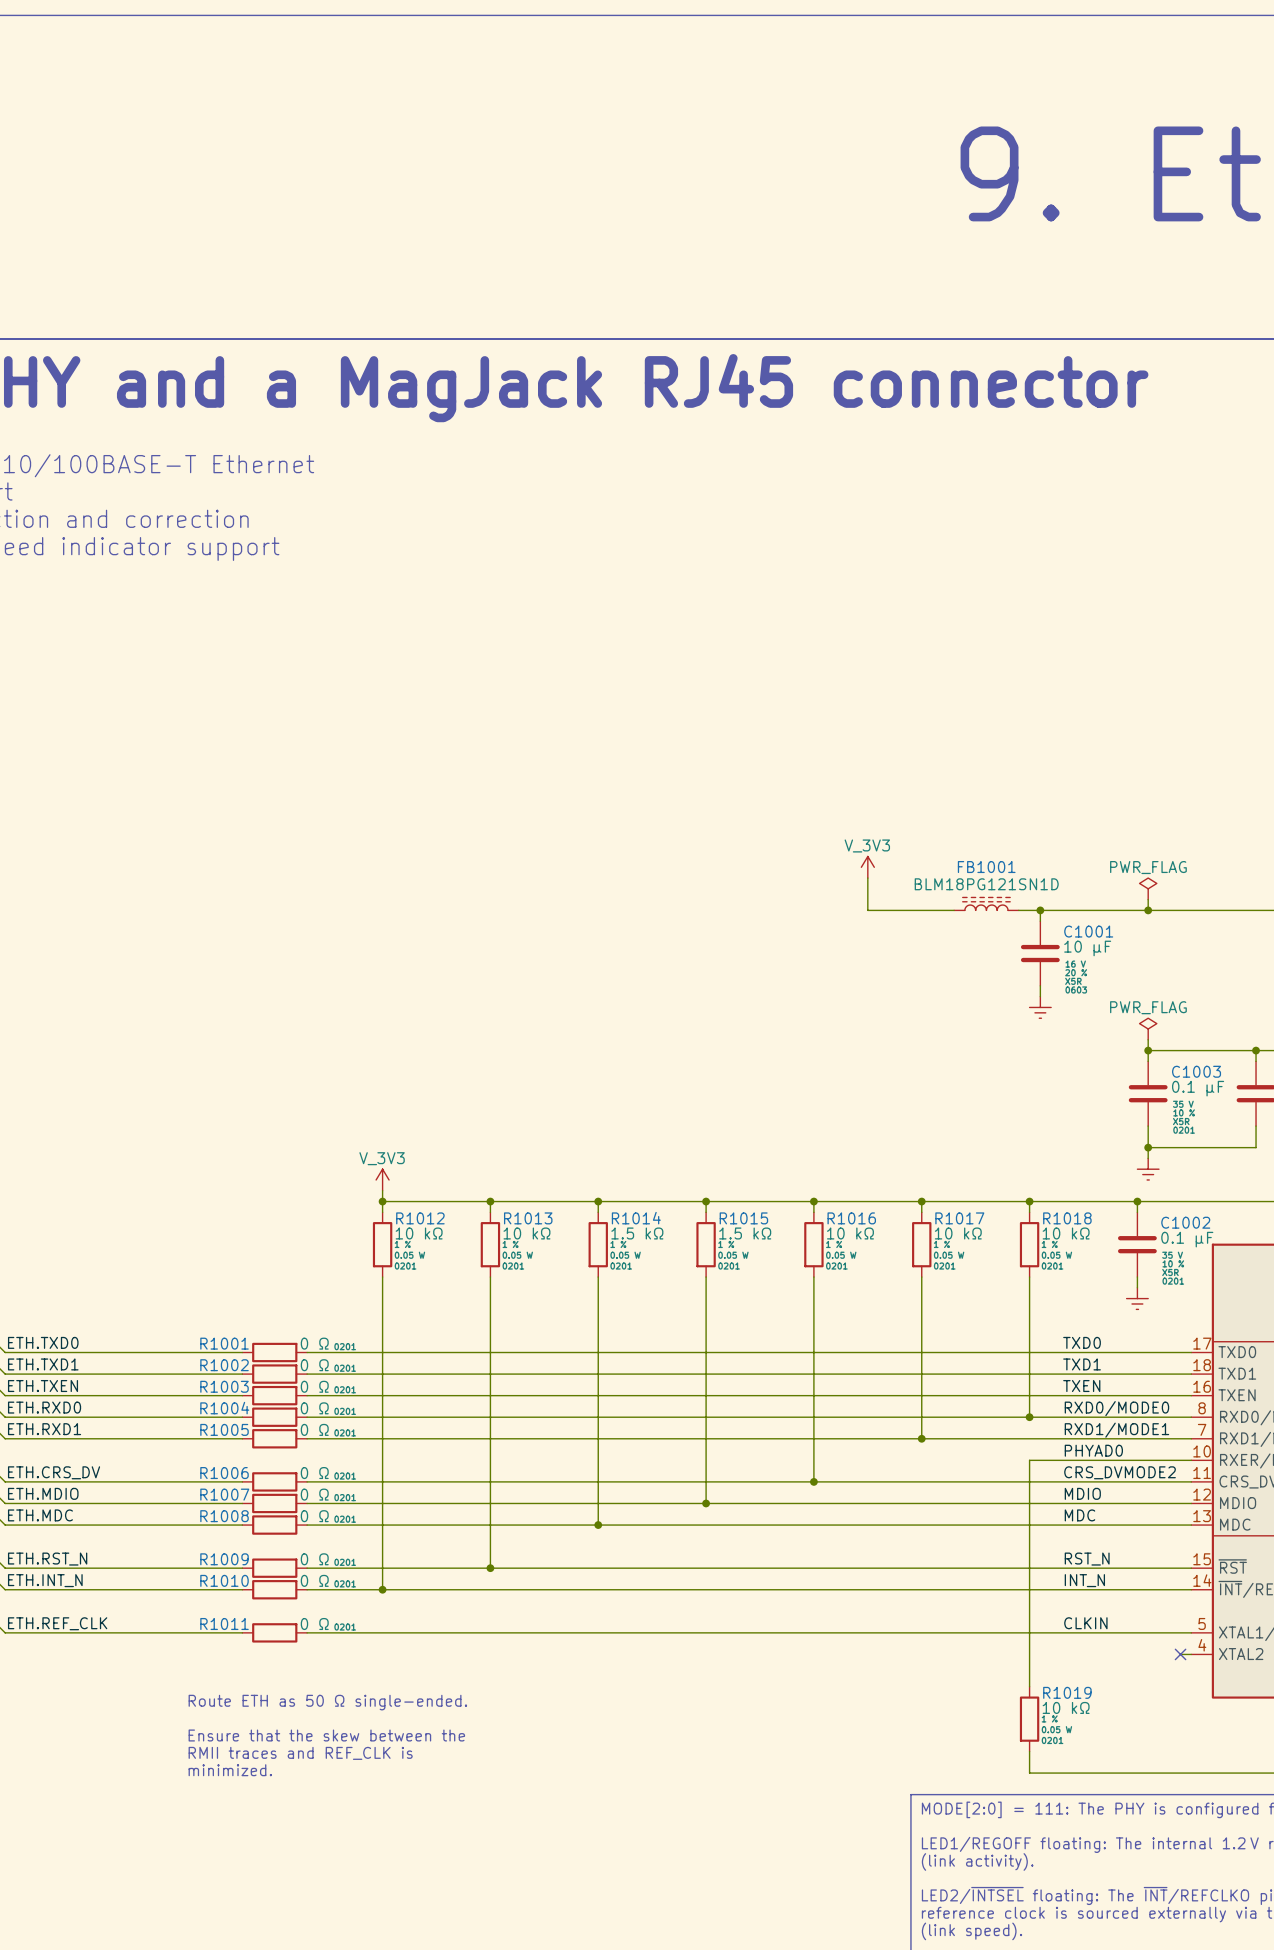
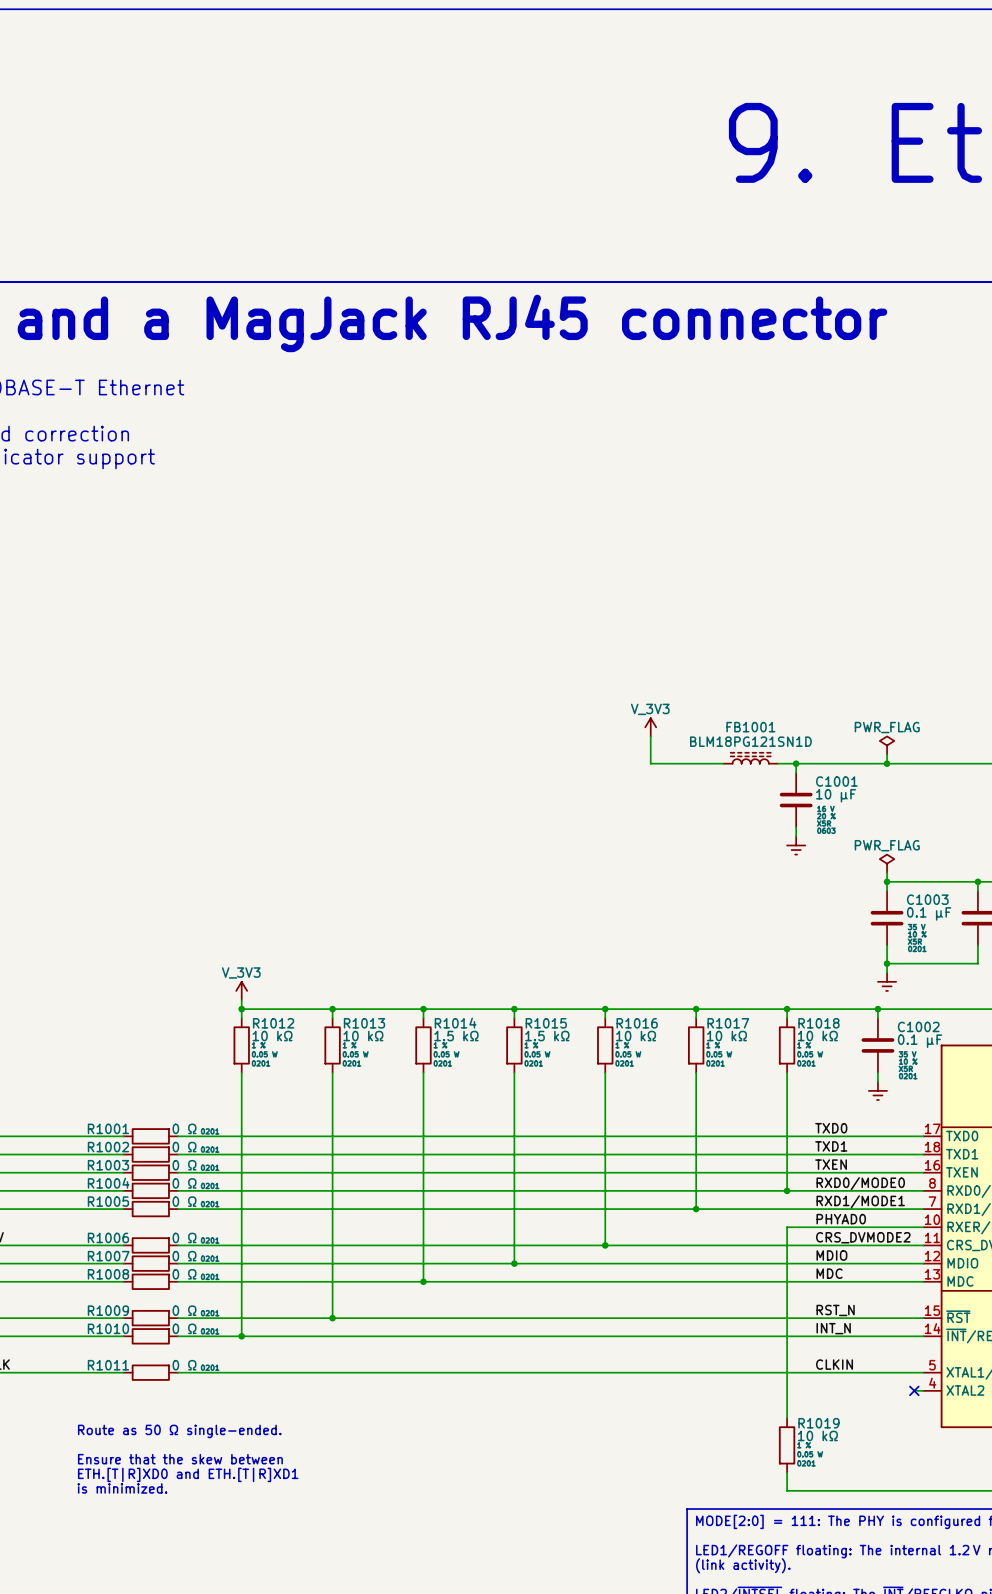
text: Route ETH as 50 Ω single-ended. (327, 1702) -> Route as 50 Ω single-ended. (179, 1431)
text: Ensure that the skew between the (326, 1735) -> Ensure that the skew between (180, 1459)
text: RMII traces and REF_CLK is (300, 1753) -> ETH.[T|R]XD0 and ETH.[T|R]XD1 (188, 1474)
text: minimized. (230, 1770) -> is minimized. (122, 1488)

